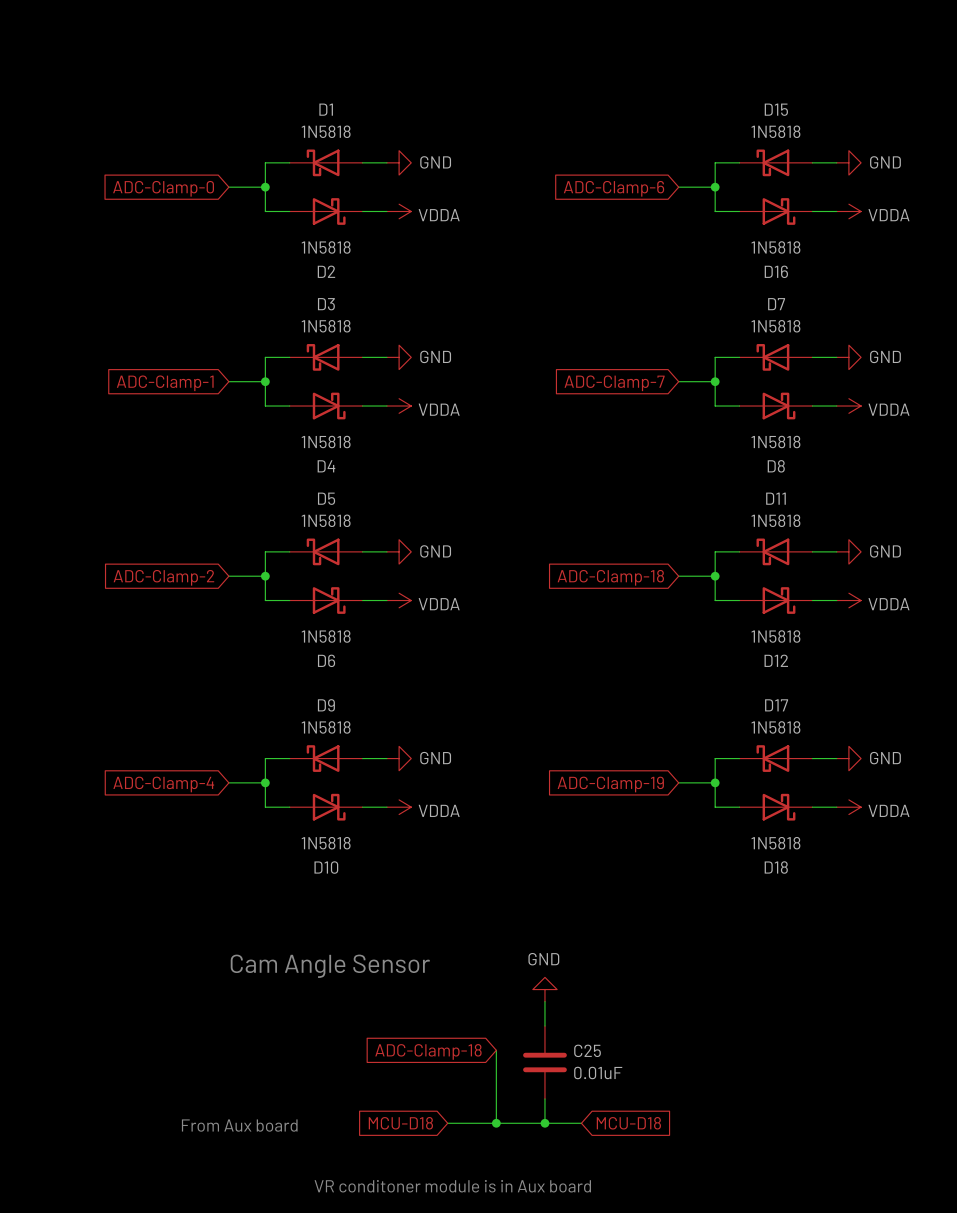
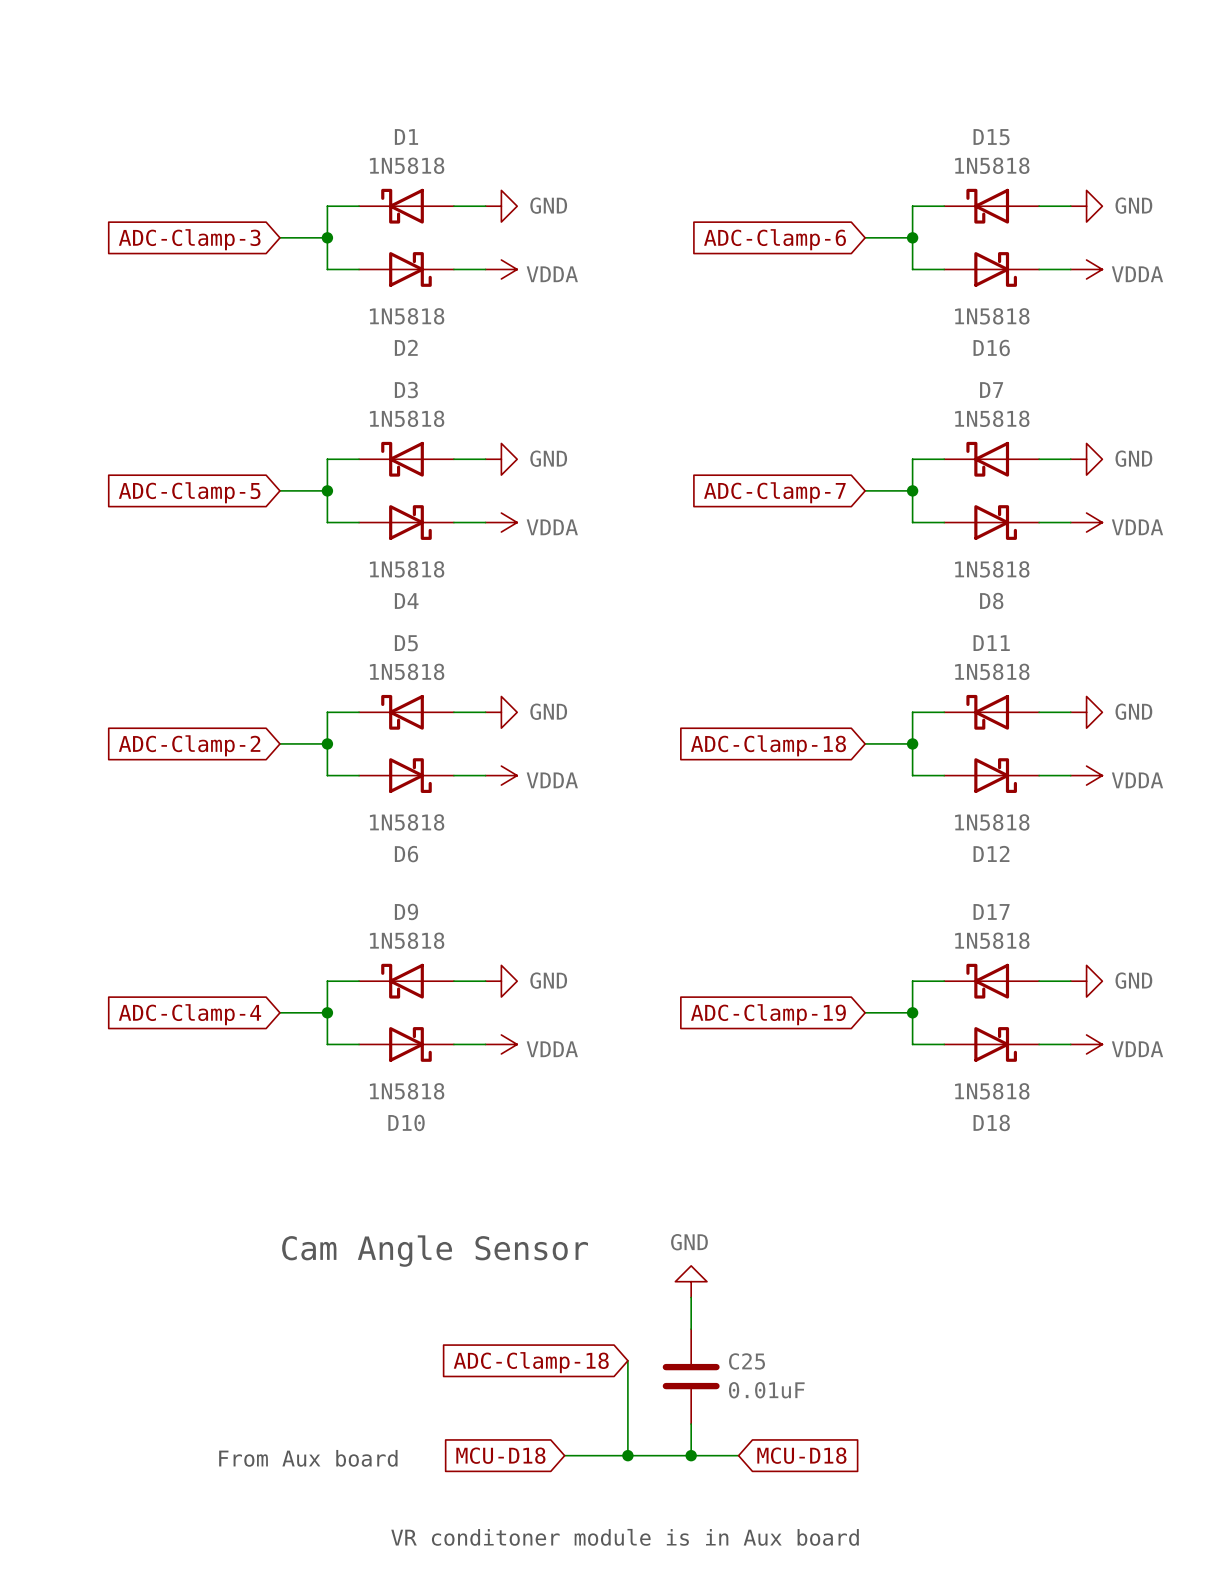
global label: ADC-Clamp-0 (163, 188) -> ADC-Clamp-3 (189, 239)
global label: ADC-Clamp-1 (165, 383) -> ADC-Clamp-5 (189, 492)

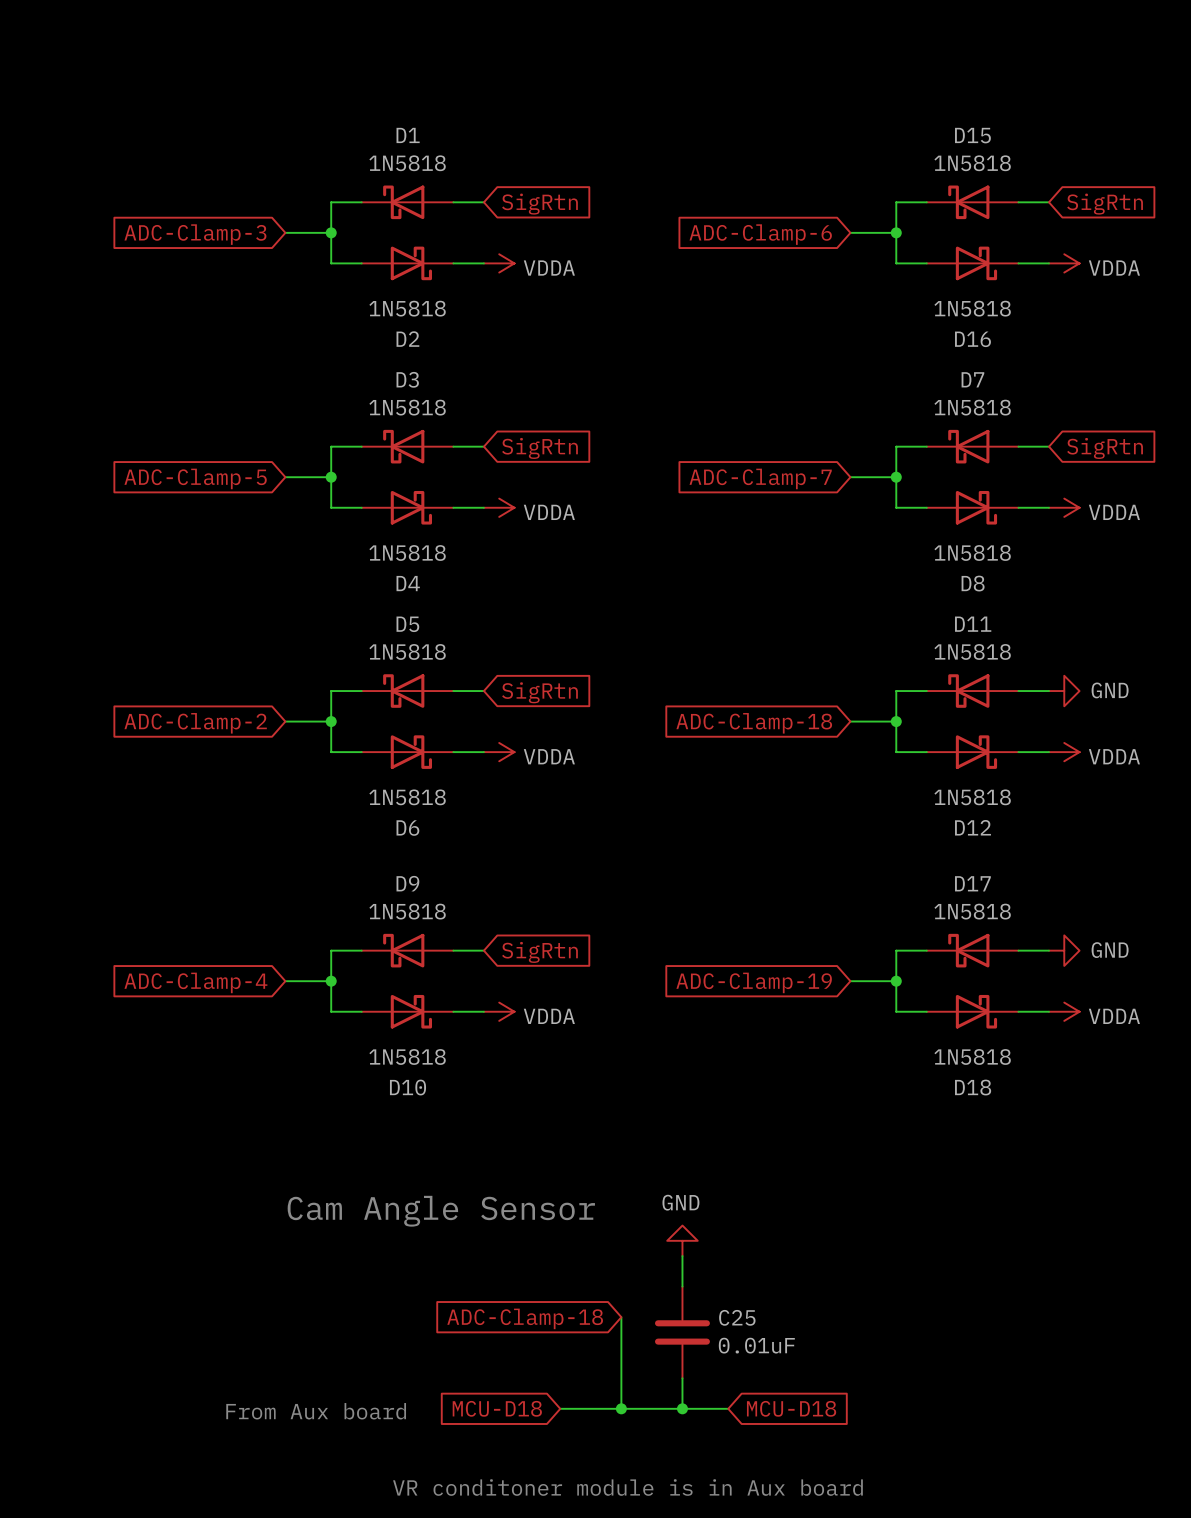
power symbol: GND (501, 206) -> none
power symbol: GND (1086, 206) -> none
global label: none -> SigRtn (539, 204)
global label: none -> SigRtn (1105, 204)
power symbol: GND (501, 459) -> none
power symbol: GND (1086, 459) -> none
global label: none -> SigRtn (539, 448)
global label: none -> SigRtn (1105, 448)
power symbol: GND (501, 712) -> none
global label: none -> SigRtn (539, 692)
power symbol: GND (501, 981) -> none
global label: none -> SigRtn (539, 952)

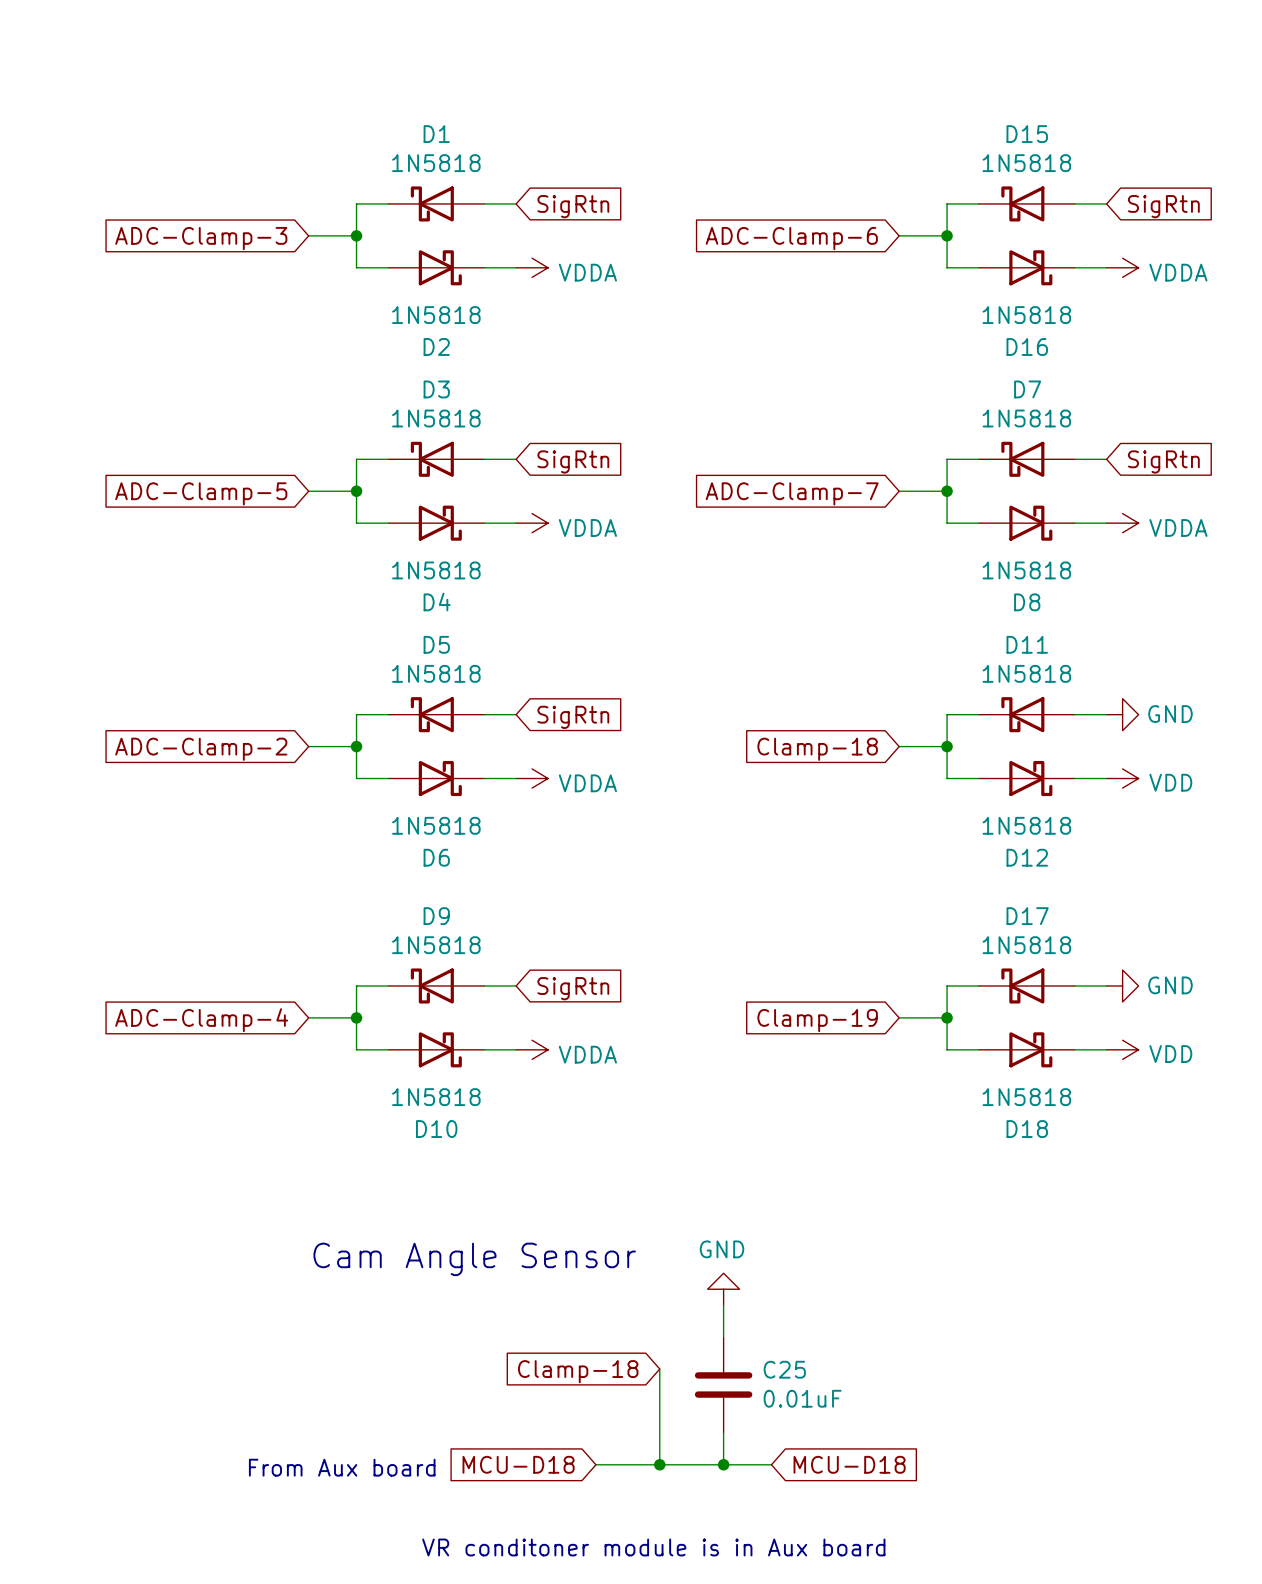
global label: ADC-Clamp-18 (754, 723) -> Clamp-18 (817, 749)
power symbol: VDDA (1064, 752) -> VDD (1122, 778)
global label: ADC-Clamp-19 (754, 982) -> Clamp-19 (817, 1020)
power symbol: VDDA (1064, 1011) -> VDD (1122, 1049)
global label: ADC-Clamp-18 (525, 1318) -> Clamp-18 (578, 1371)

